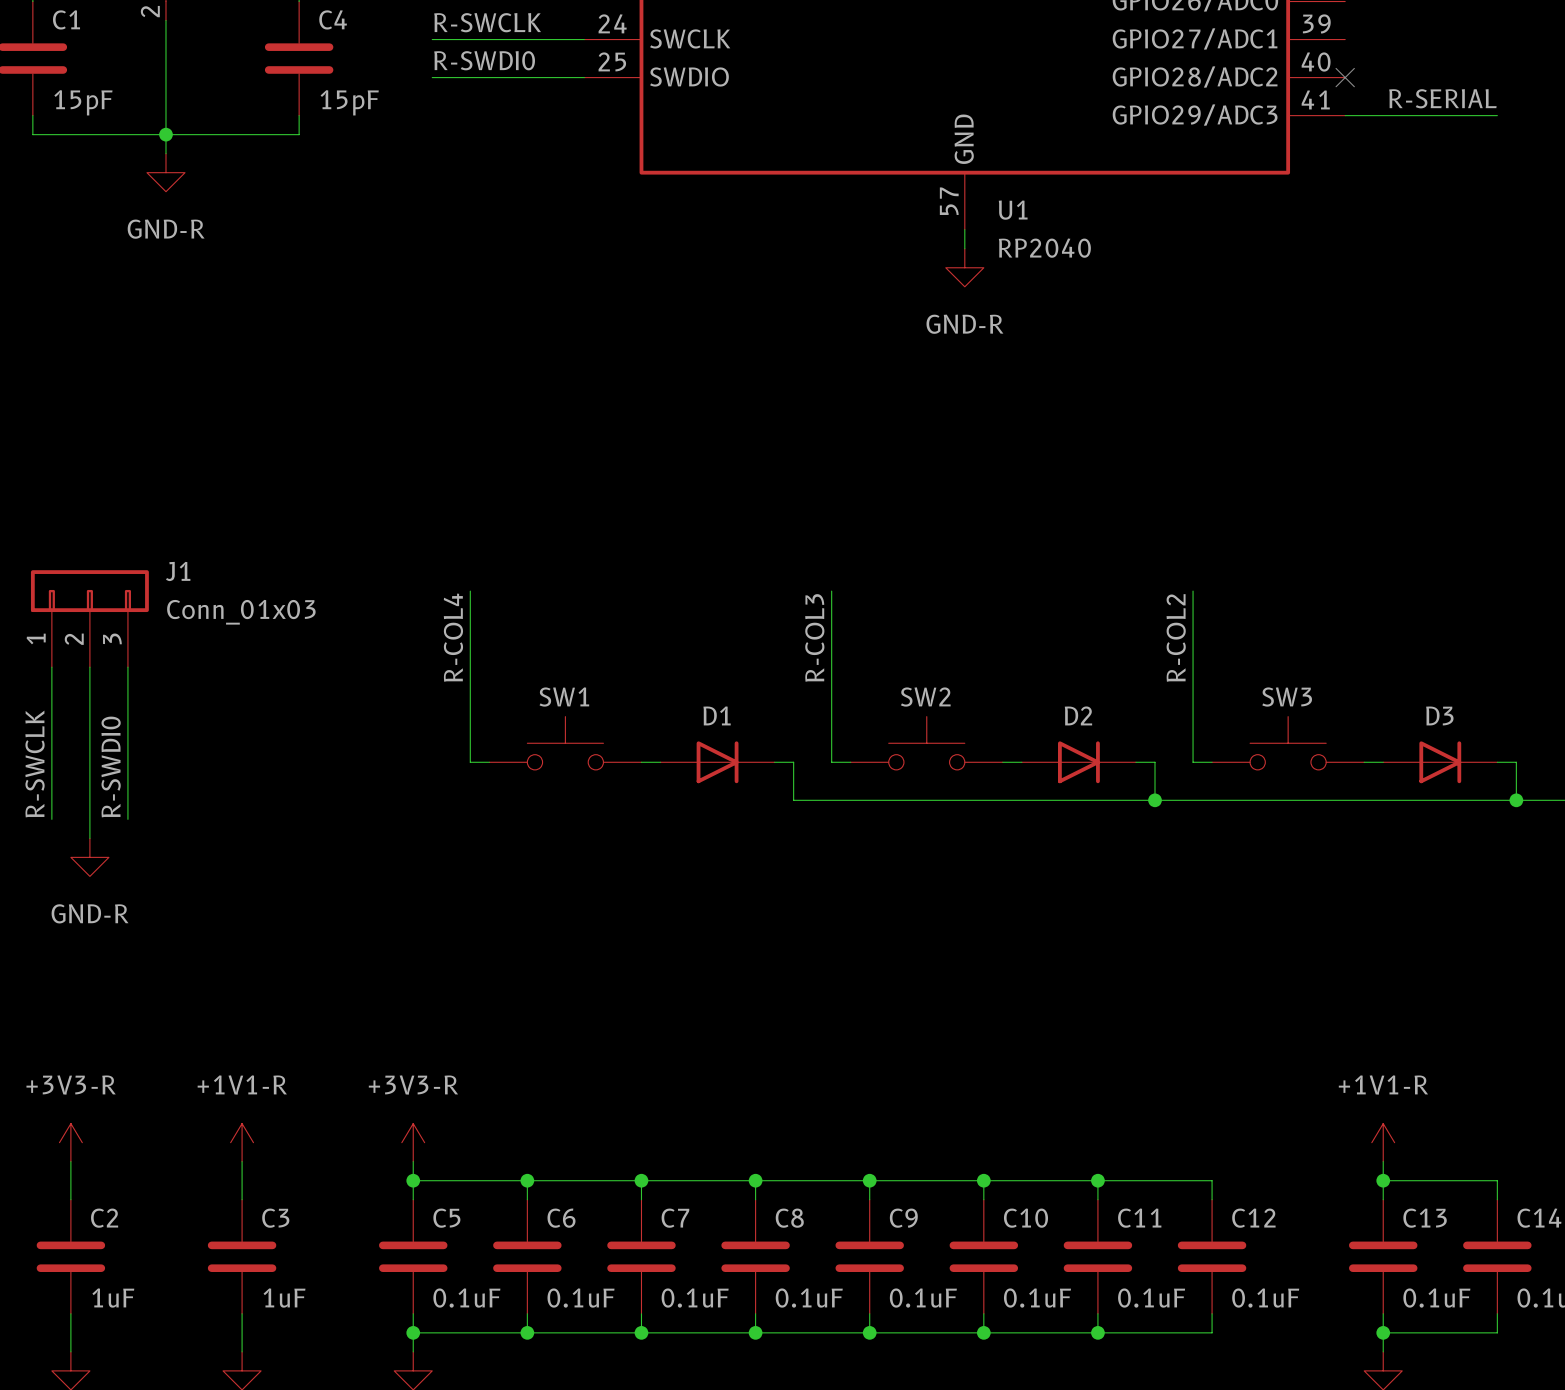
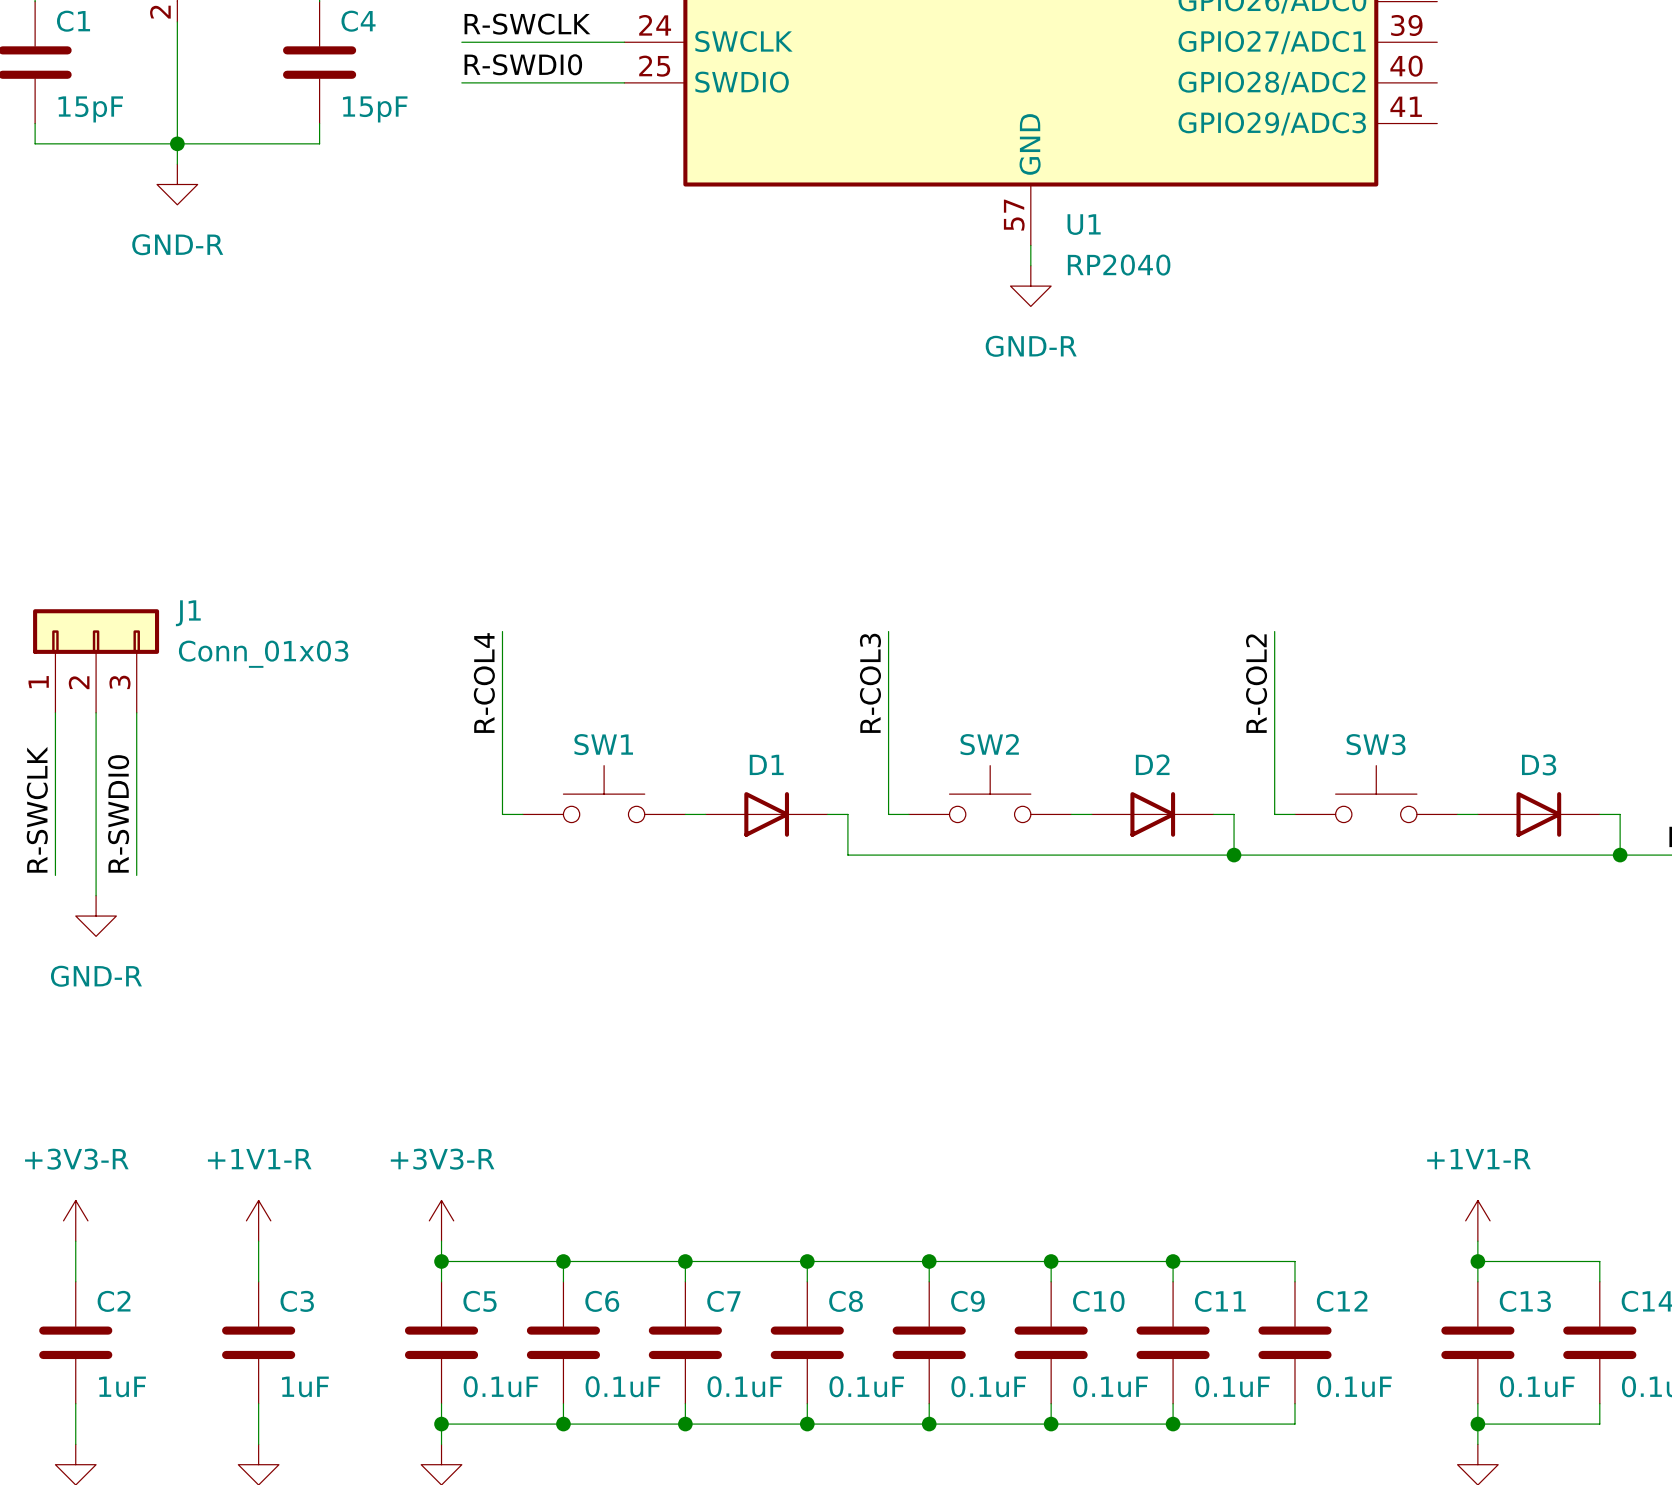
no-connect mark: (1345, 77) -> none
label: R-SERIAL (1442, 98) -> none
wire: (1345, 115) (1497, 115) -> none

